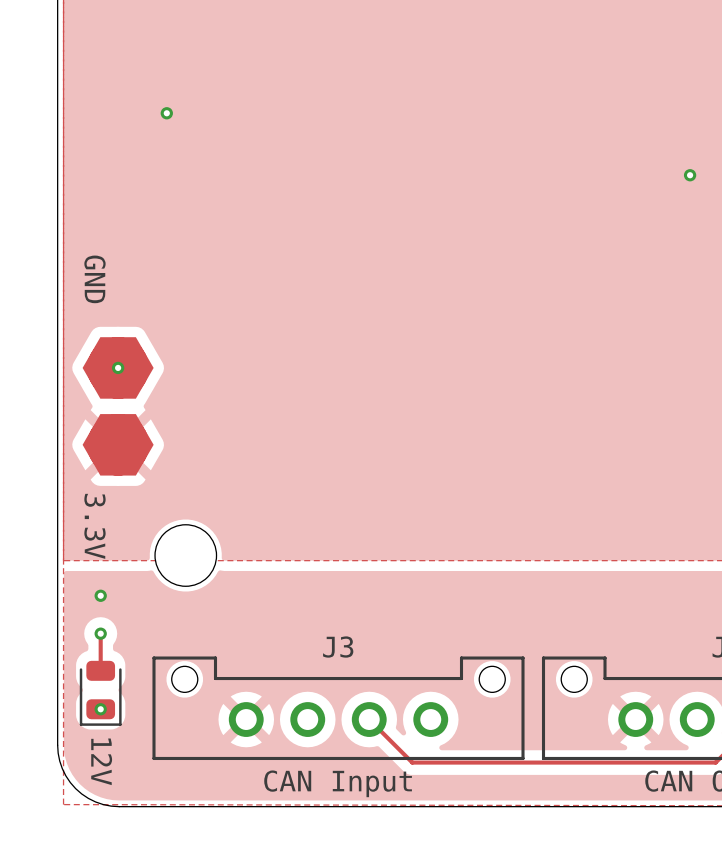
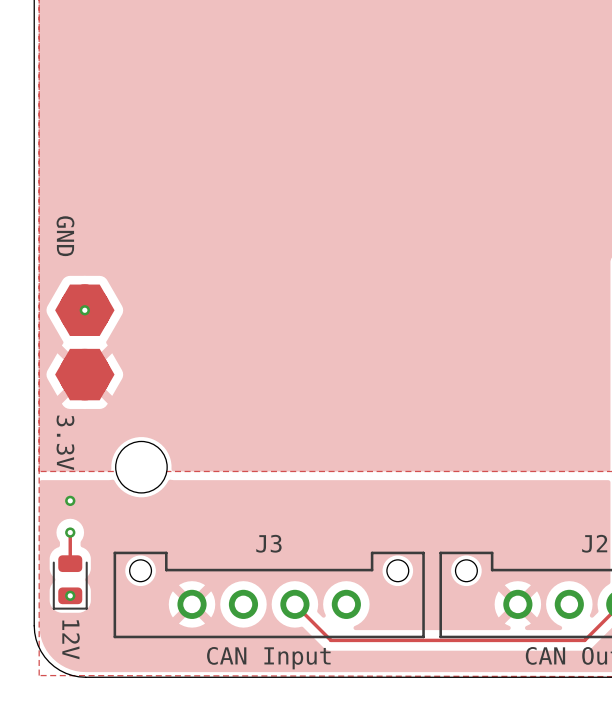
via: (166, 113) -> none
via: (690, 175) -> none

